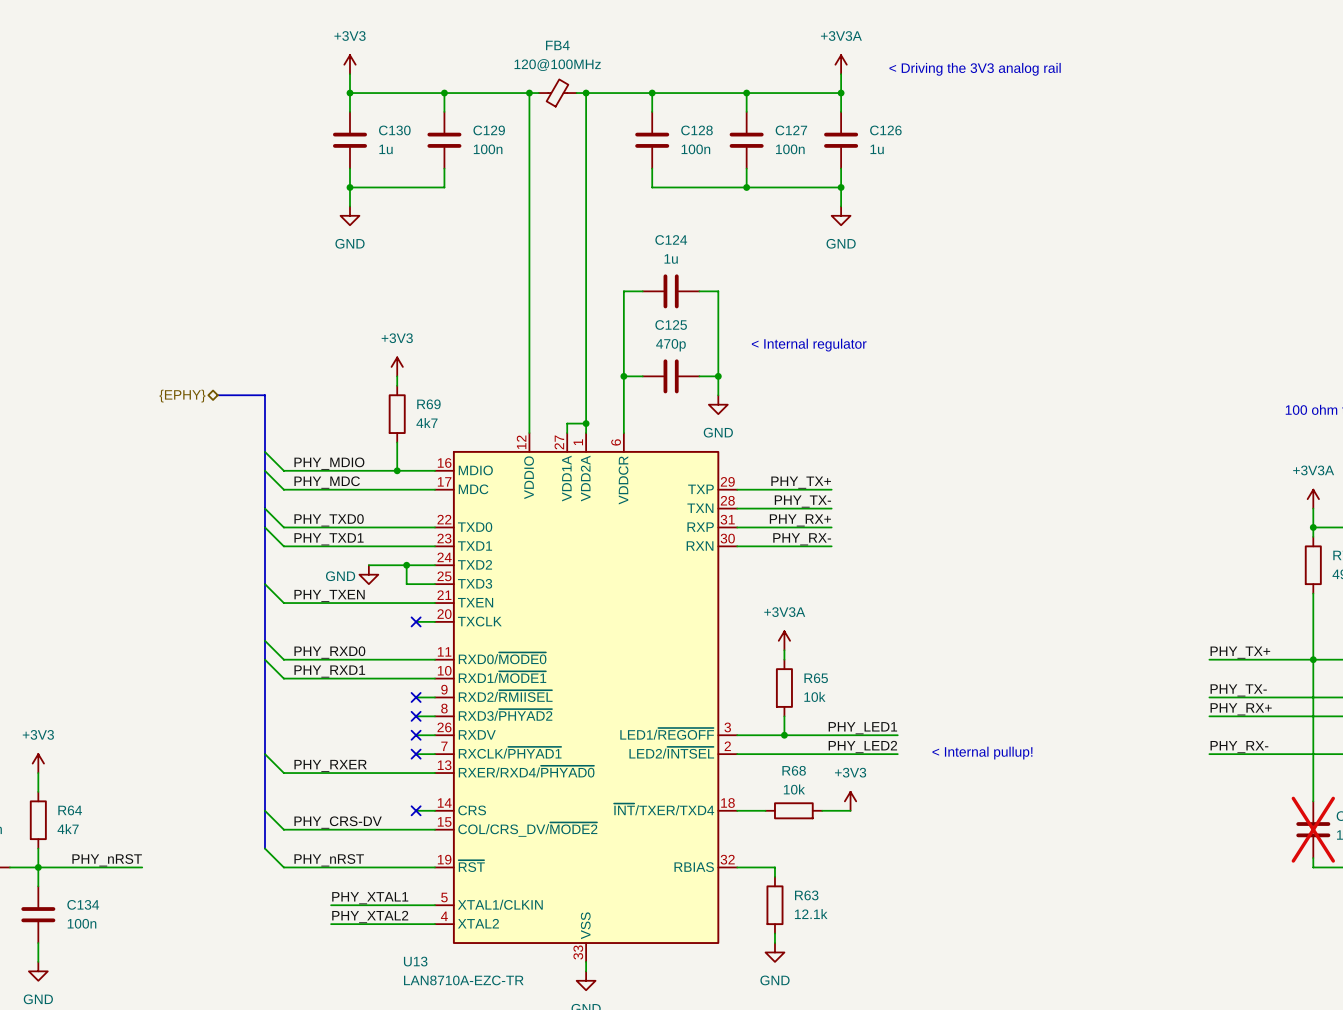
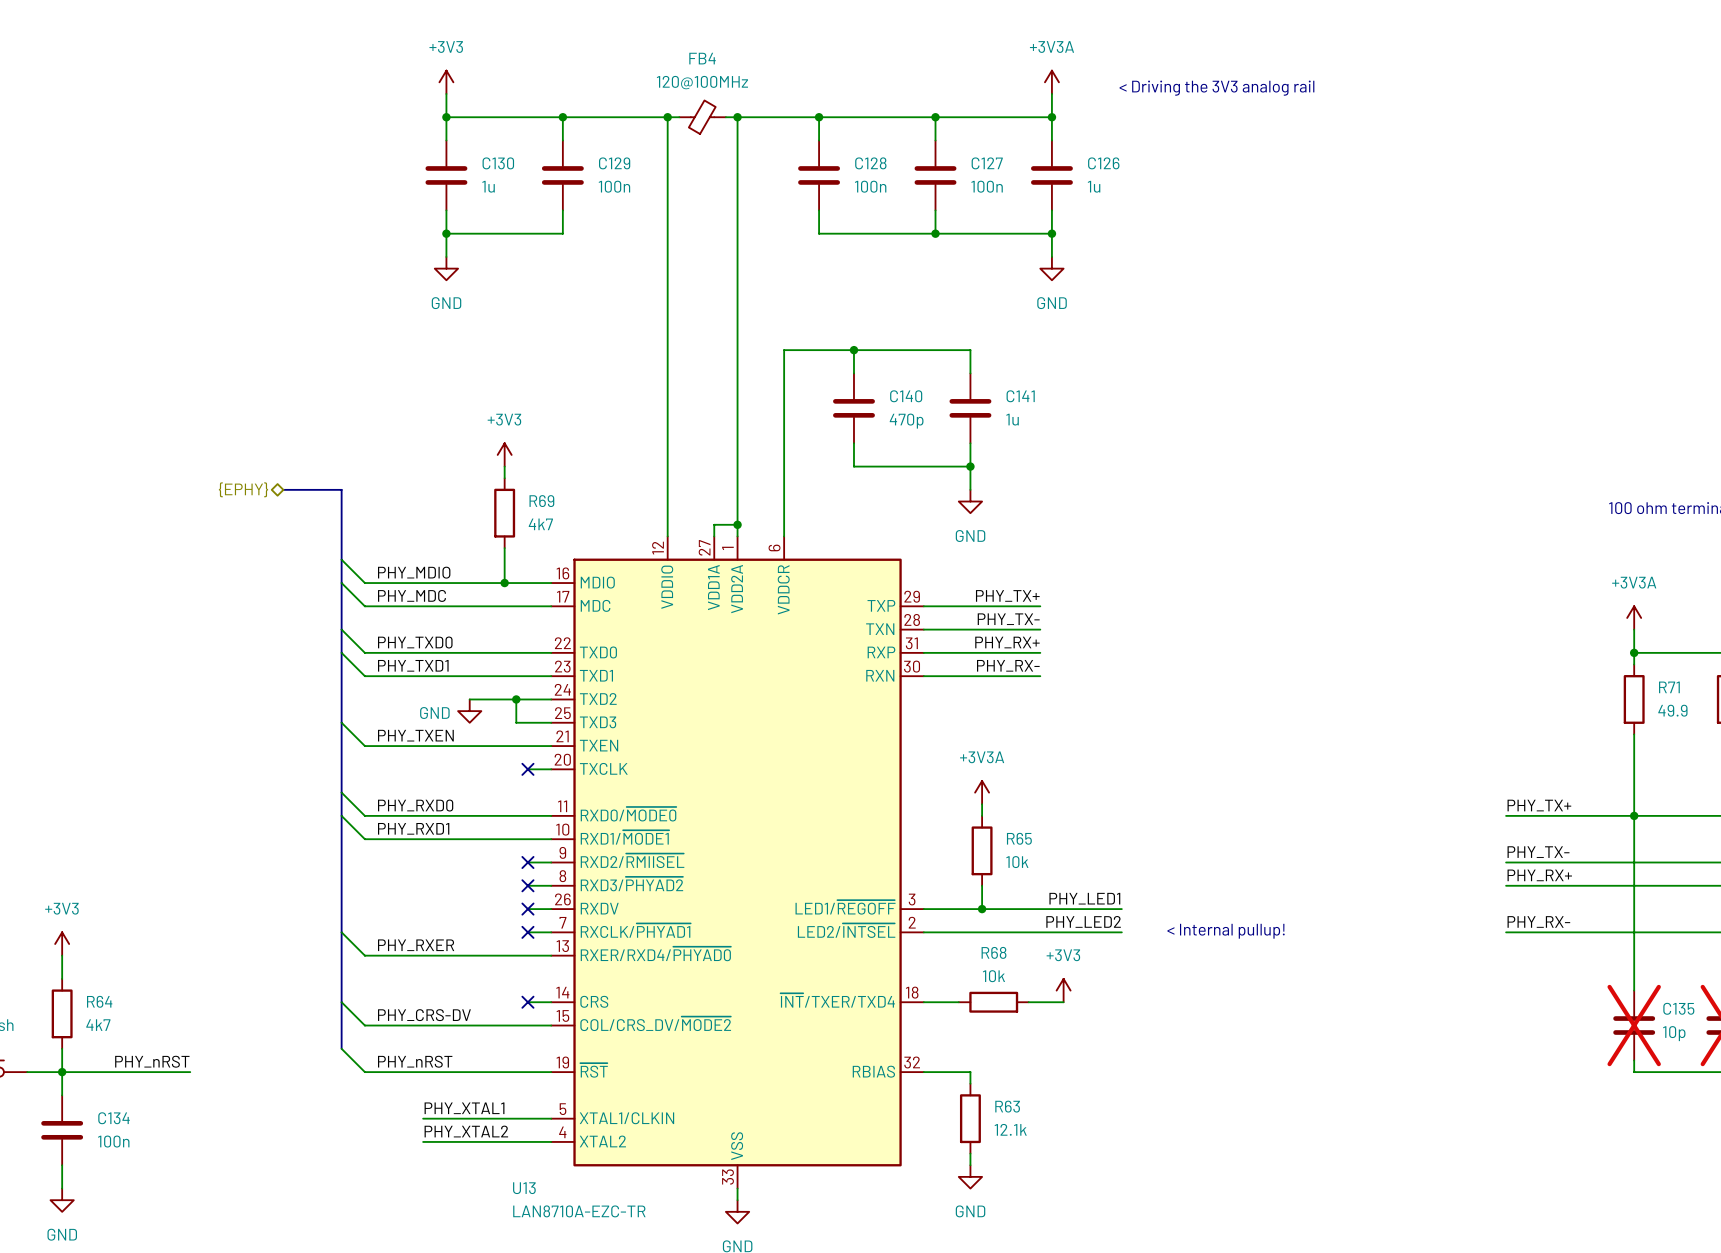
wire: none -> (853, 350) (853, 373)
junction: none -> (853, 350)
wire: (623, 291) (642, 291) -> (784, 361) (784, 350) (970, 350) (970, 373)
C124: 1u (671, 291) -> none
wire: (699, 291) (718, 291) (718, 395) -> none
C140: none -> 470p (853, 408)
C141: none -> 1u (970, 408)
text: < Internal regulator (809, 345) -> none
wire: none -> (853, 443) (853, 466) (877, 466)
wire: none -> (970, 443) (970, 489)
wire: (623, 376) (642, 376) -> none
junction: (623, 376) -> none
C125: 470p (671, 376) -> none
wire: none -> (900, 466) (970, 466)
junction: (718, 376) -> none
junction: none -> (970, 466)
power symbol position: GND (718, 404) -> GND (970, 501)

